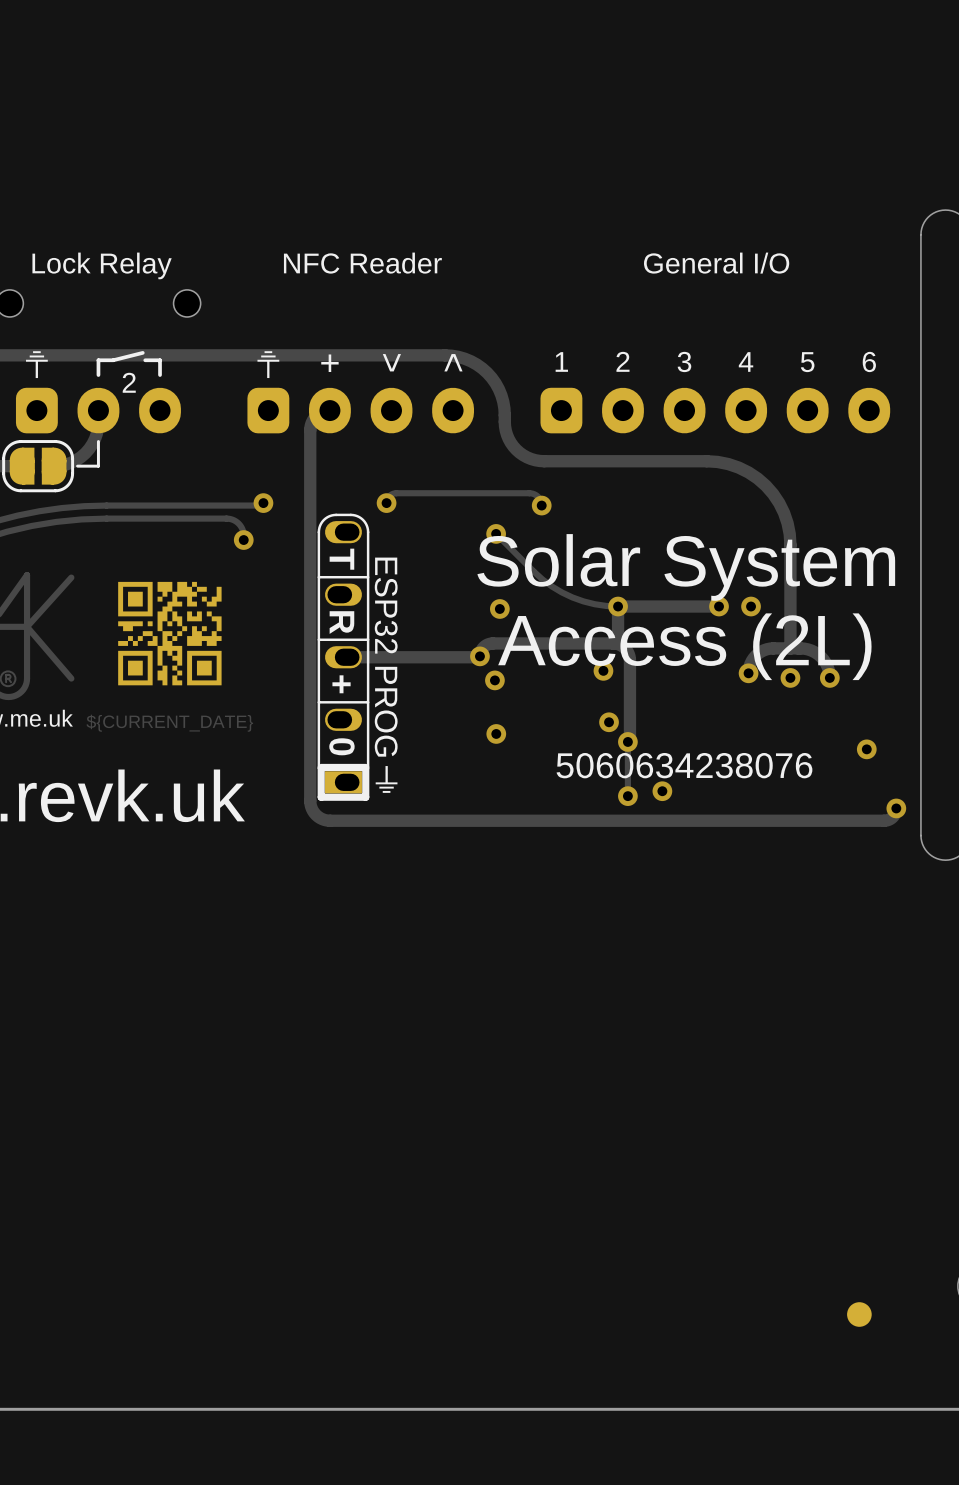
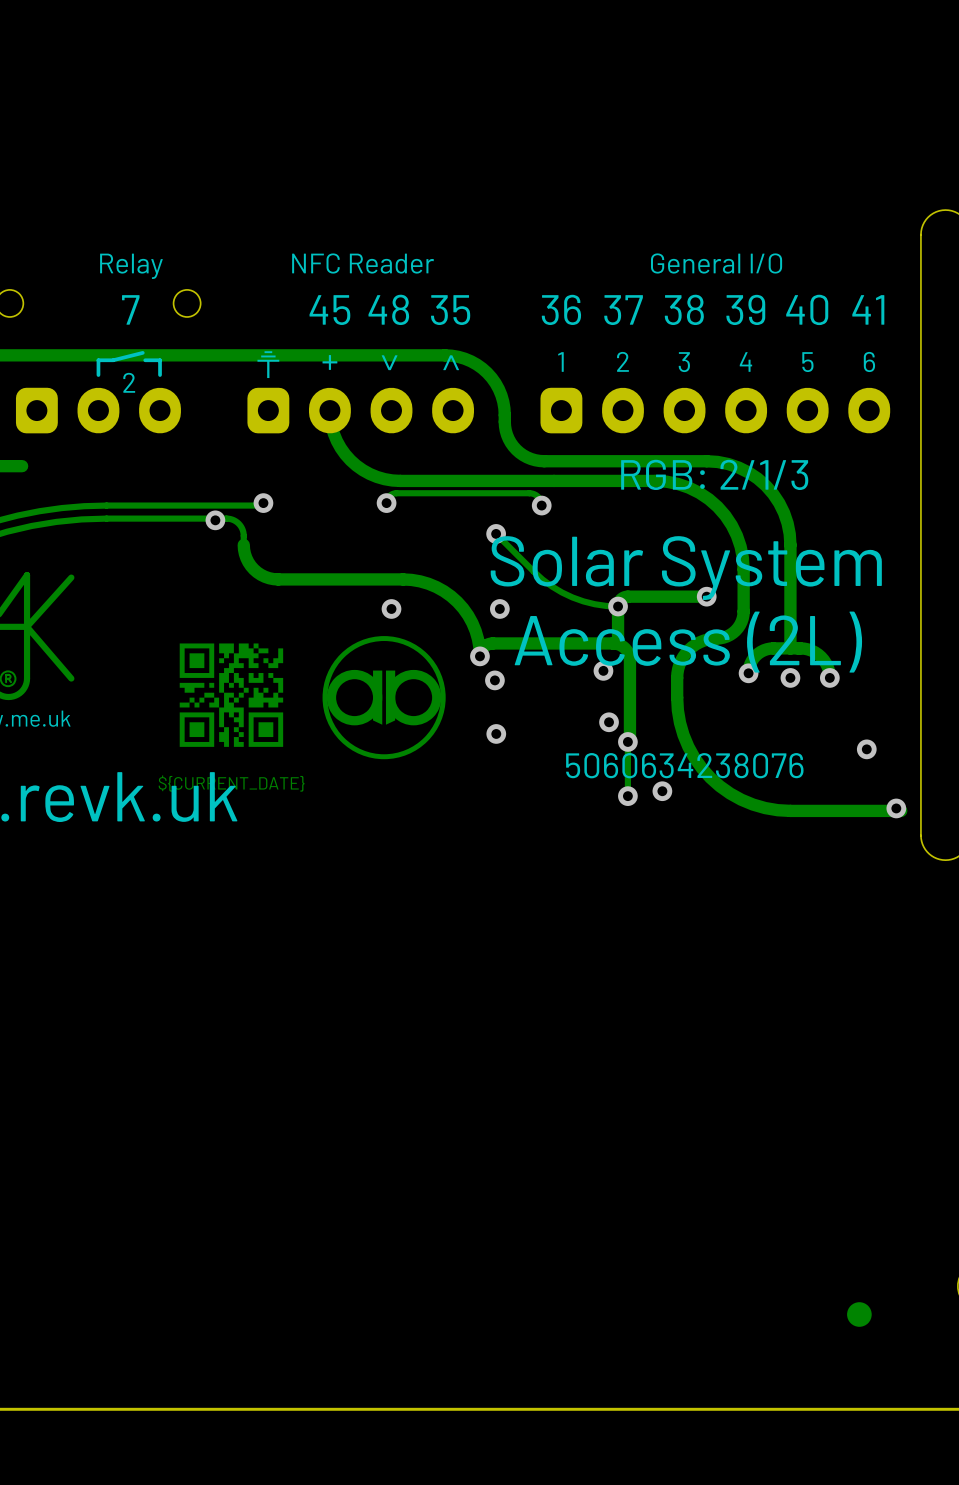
text: Lock Relay (102, 265) -> Relay (131, 266)
text: none -> 7 (130, 309)
text: none -> 48 (388, 309)
text: none -> 35 (450, 310)
text: none -> 36 (561, 309)
text: none -> 37 (623, 310)
text: none -> 38 (684, 309)
text: none -> 39 (745, 309)
text: none -> 40 (807, 309)
text: none -> 41 (868, 309)
text: none -> 45 (329, 310)
text: ⏚ (36, 364) -> none
track: (329, 410) (316, 416) (310, 430) (310, 800) (312, 810) (318, 816) (330, 820) (884, 820) (892, 817) (896, 808) -> (329, 410) (333, 433) (345, 454) (362, 470) (384, 479) (400, 480) (654, 480) (666, 481) (688, 487) (708, 499) (717, 506) (731, 525) (740, 546) (743, 569) (743, 611) (741, 621) (733, 632) (723, 637) (707, 639) (695, 644) (685, 653) (679, 664) (677, 677) (677, 710) (683, 735) (694, 757) (719, 786) (741, 799) (765, 808) (790, 810) (901, 810)
track: (98, 421) (95, 438) (85, 453) (71, 462) (54, 466) -> none
line: (98, 441) (98, 466) (77, 466) -> none
part: (38, 466) -> none
text: none -> RGB: 2/1/3 (714, 474)
via position: (243, 540) -> (215, 520)
track: (533, 571) (561, 592) (594, 604) (618, 606) (719, 606) -> (533, 571) (551, 586) (572, 597) (606, 605) (618, 606) (620, 600) (626, 596) (706, 596)
via position: (719, 606) -> (706, 596)
via: (751, 606) -> none
via: none -> (391, 608)
part position: (169, 633) -> (231, 695)
drawing: none -> [322, 636, 446, 760]
track: (479, 656) (347, 657) -> (479, 656) (478, 639) (468, 615) (457, 601) (436, 587) (420, 581) (403, 579) (269, 578) (257, 572) (250, 565) (244, 553) (243, 544)
part: (343, 657) -> none

